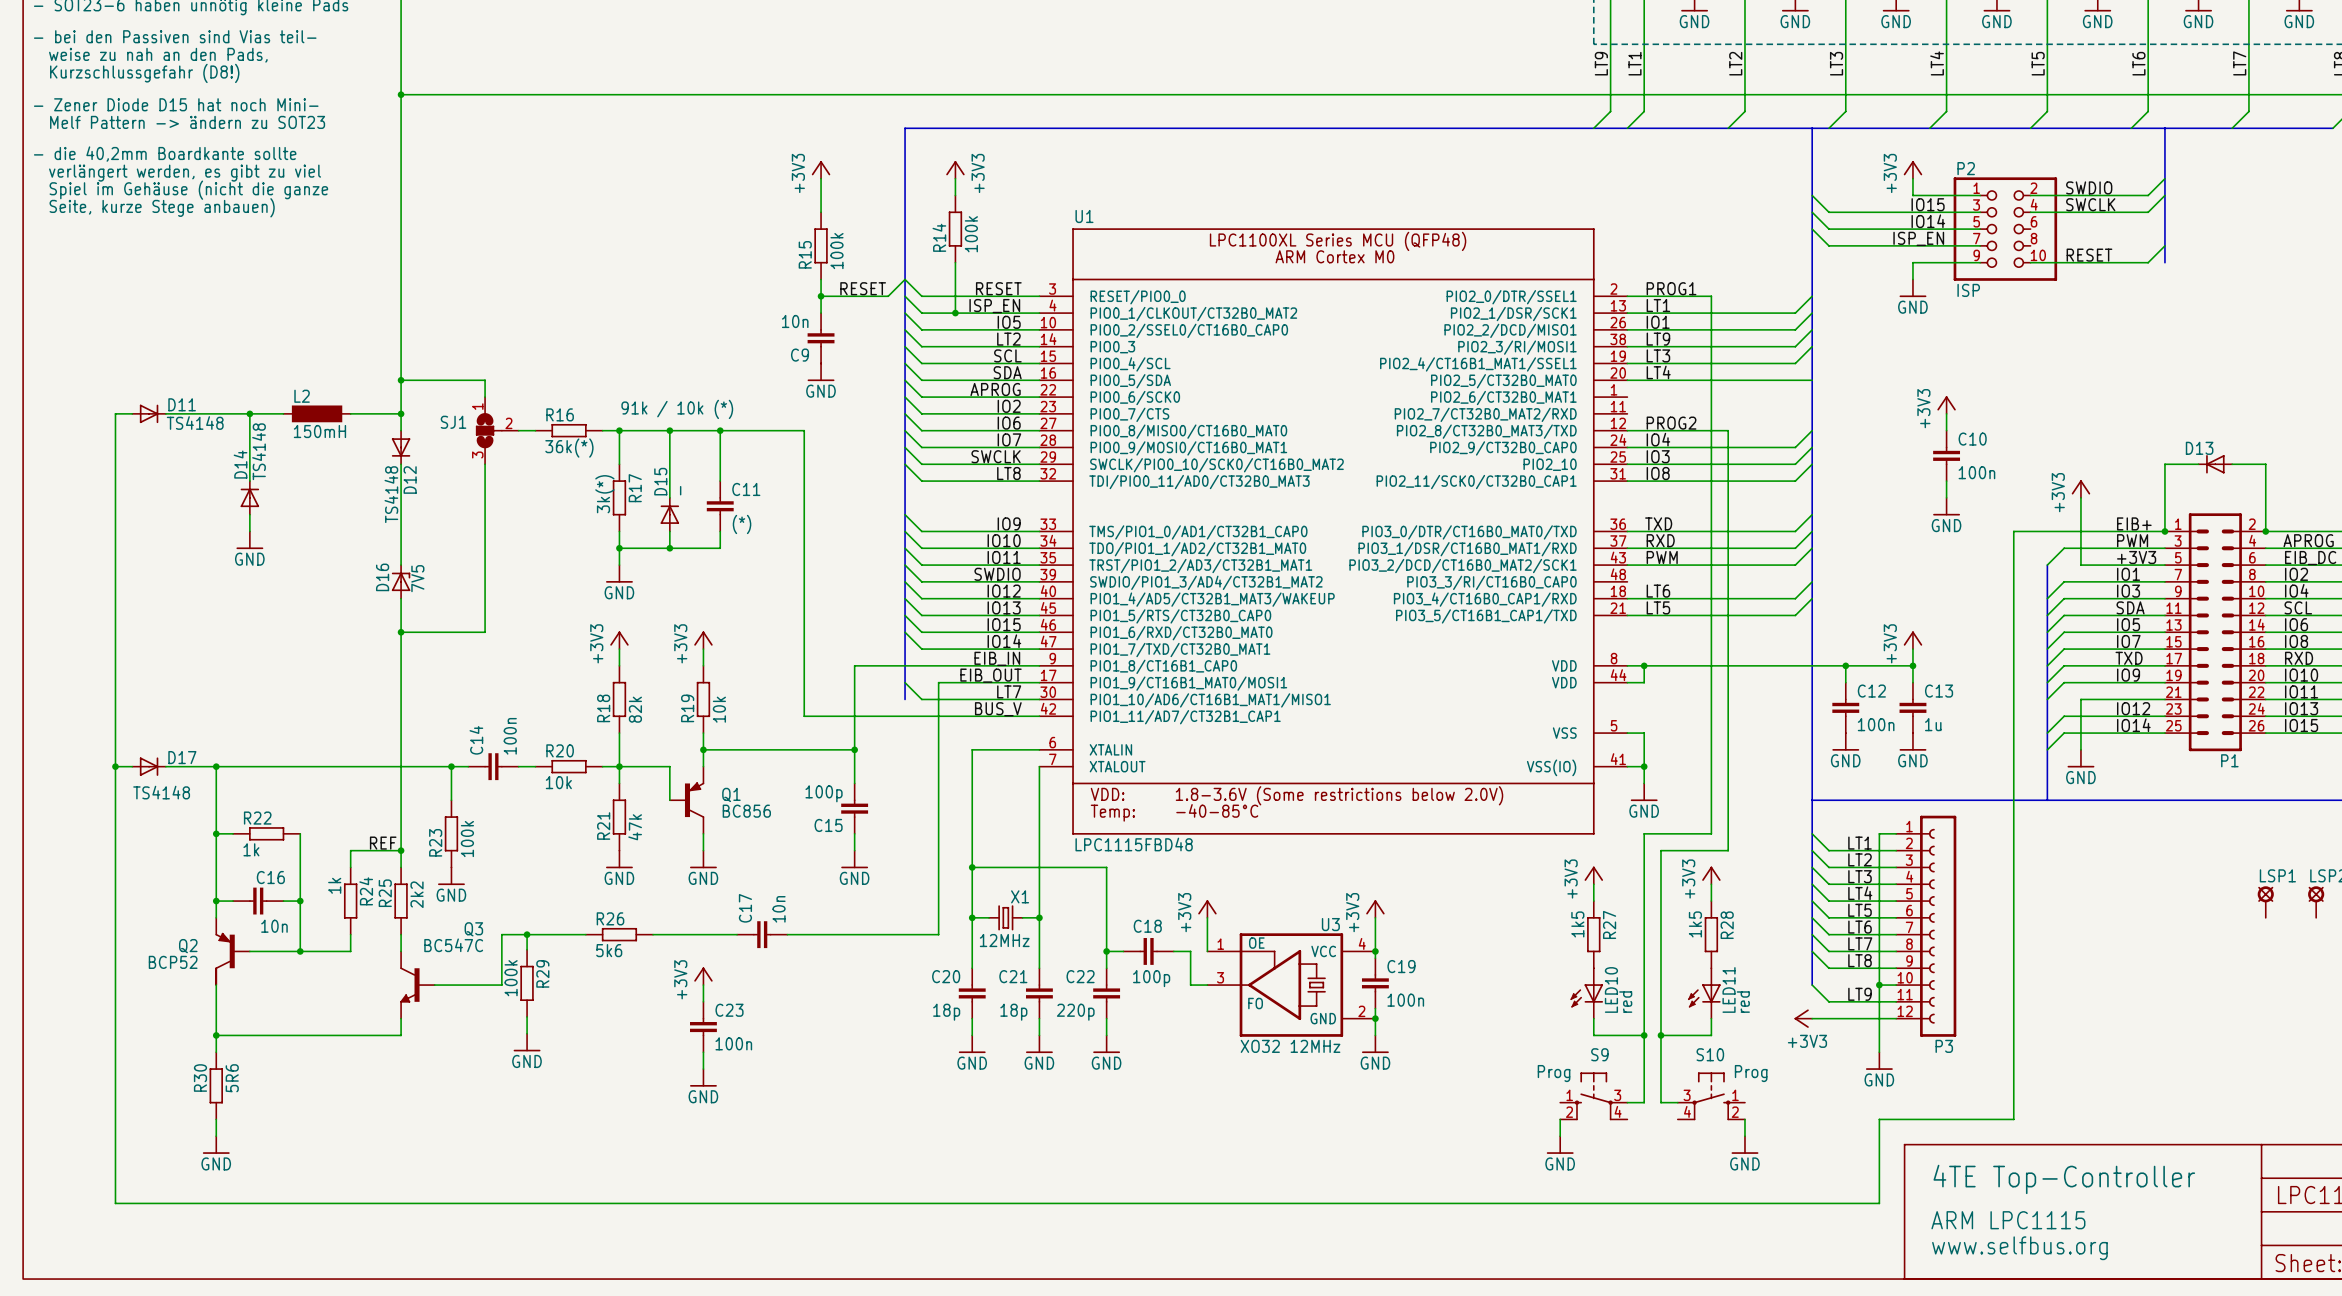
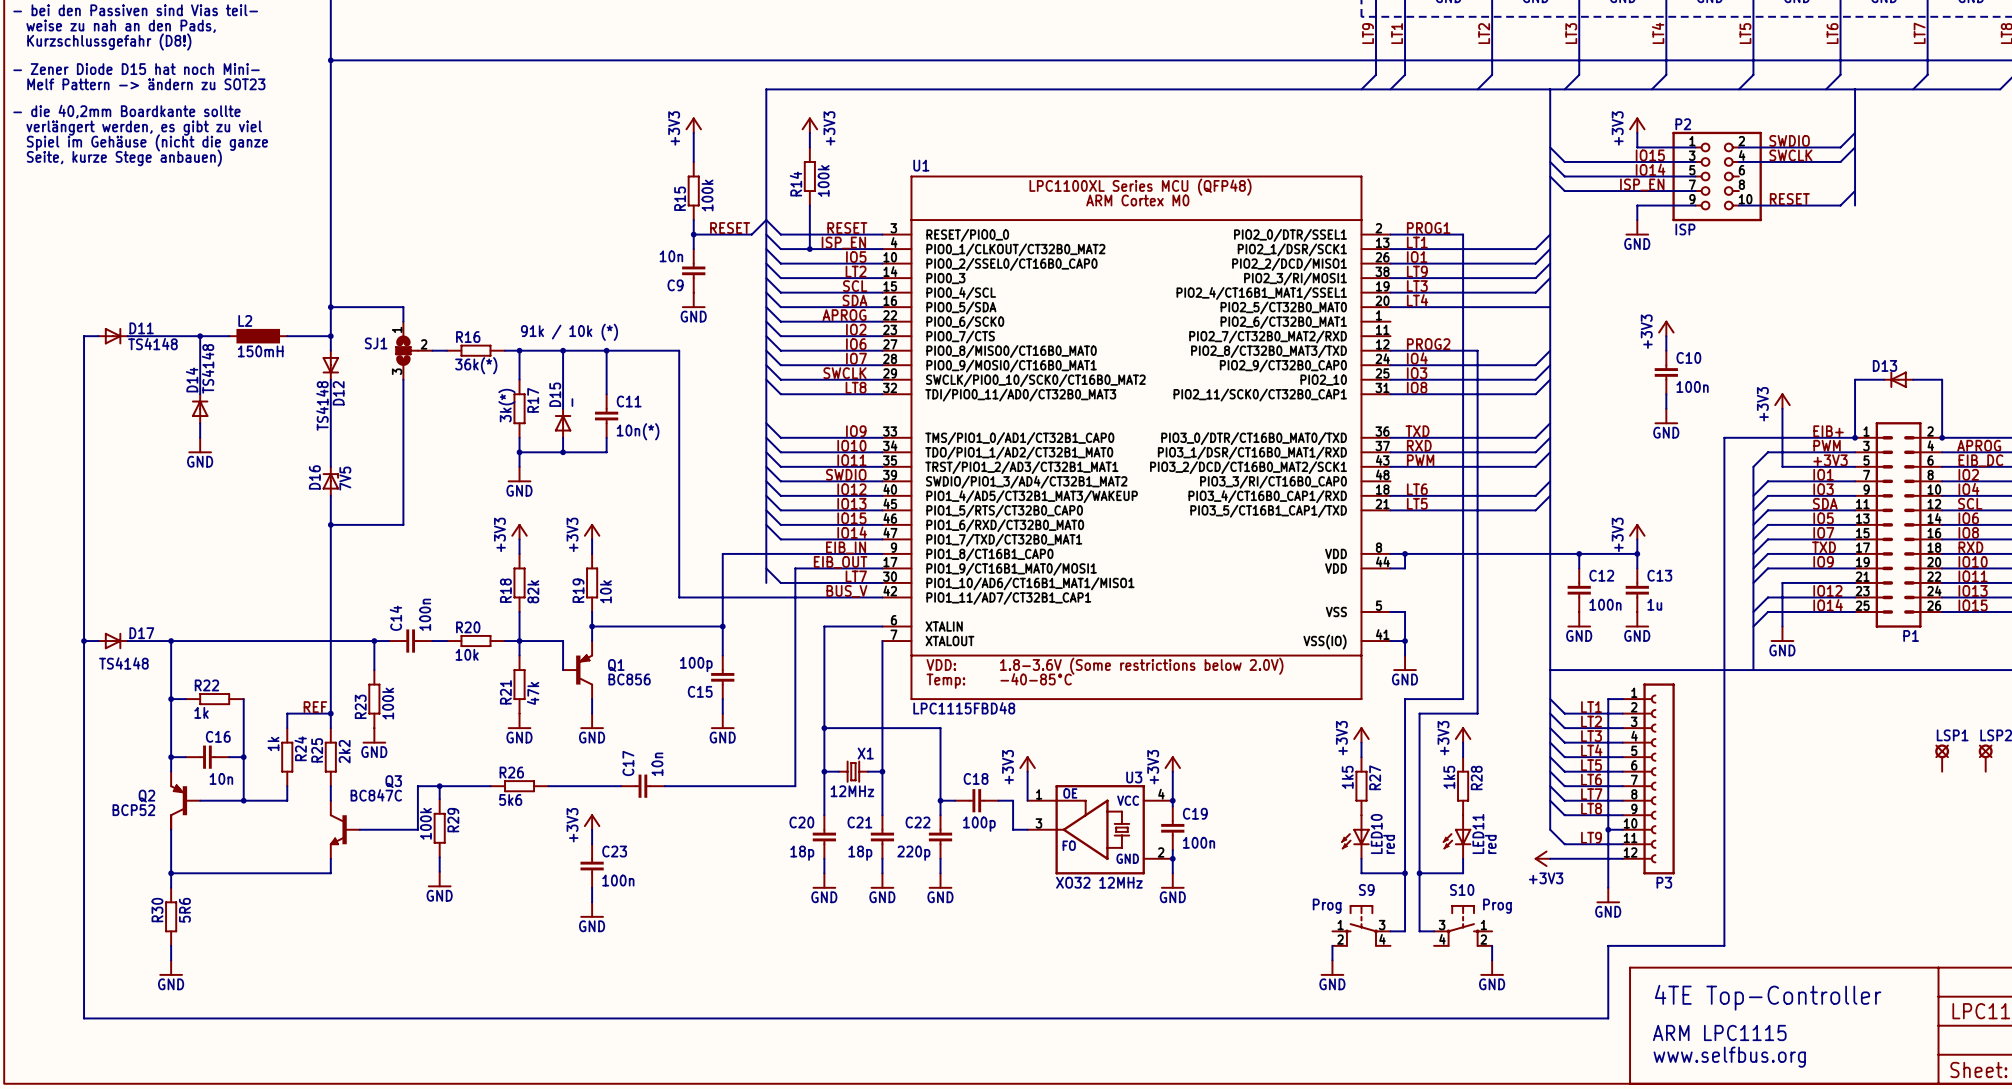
C11 value: (*) (742, 524) -> 10n(*) (638, 431)
Q3 value: BC547C (453, 945) -> BC847C (376, 795)

